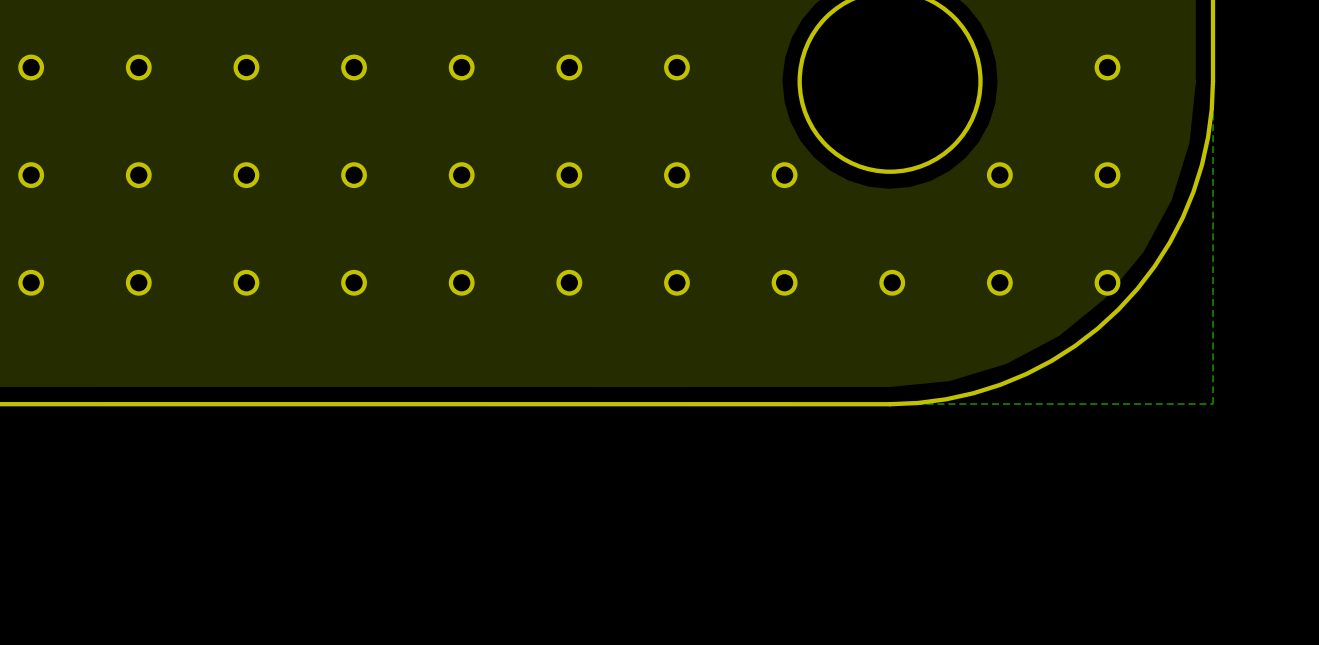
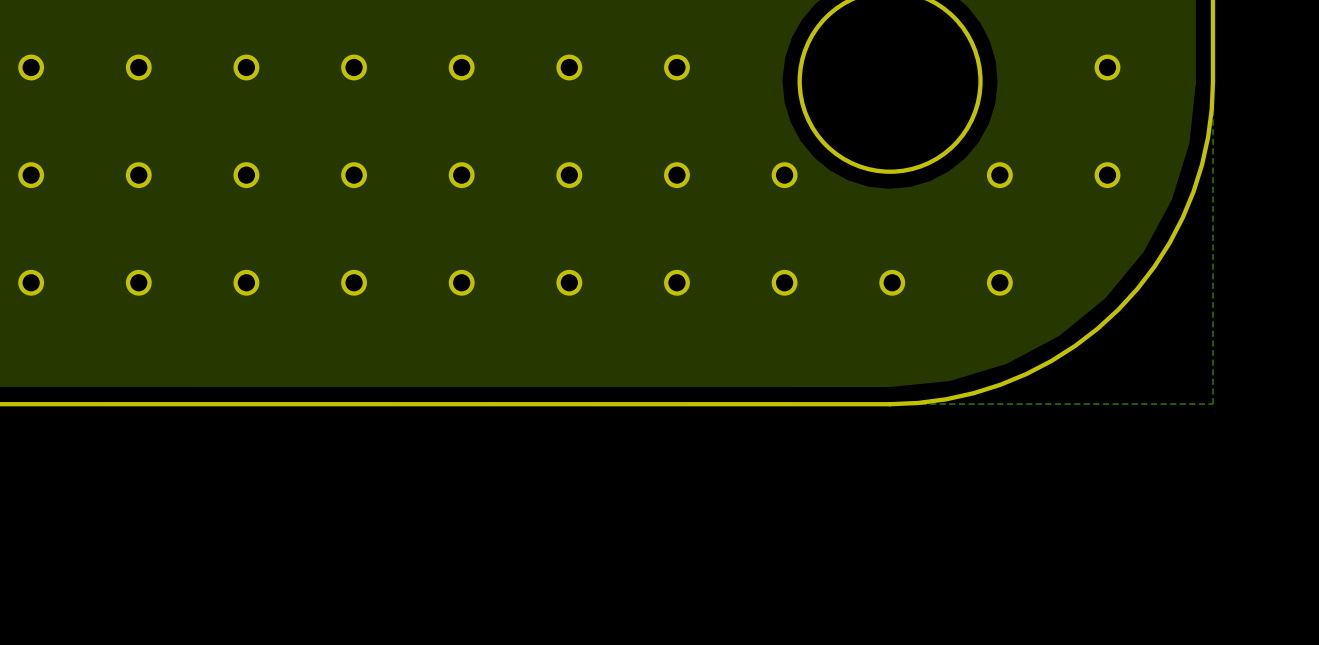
part: (1107, 282) -> none

